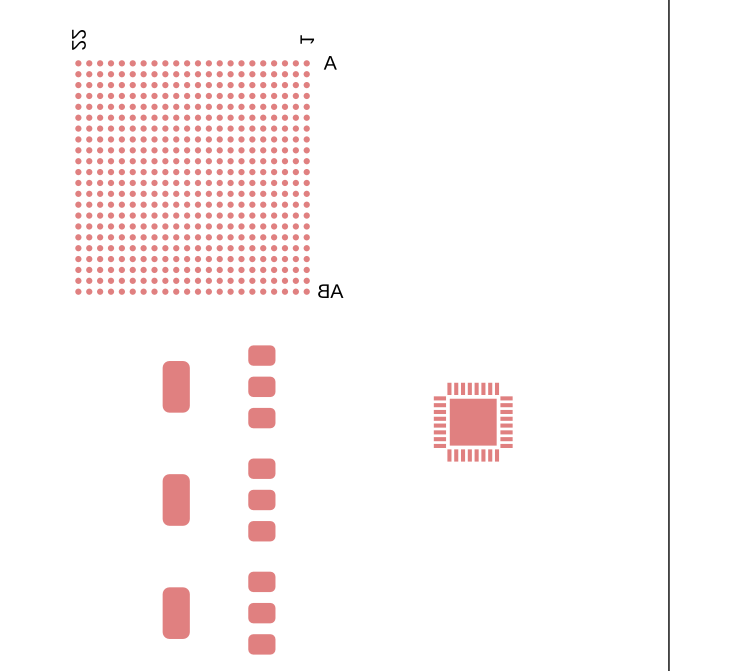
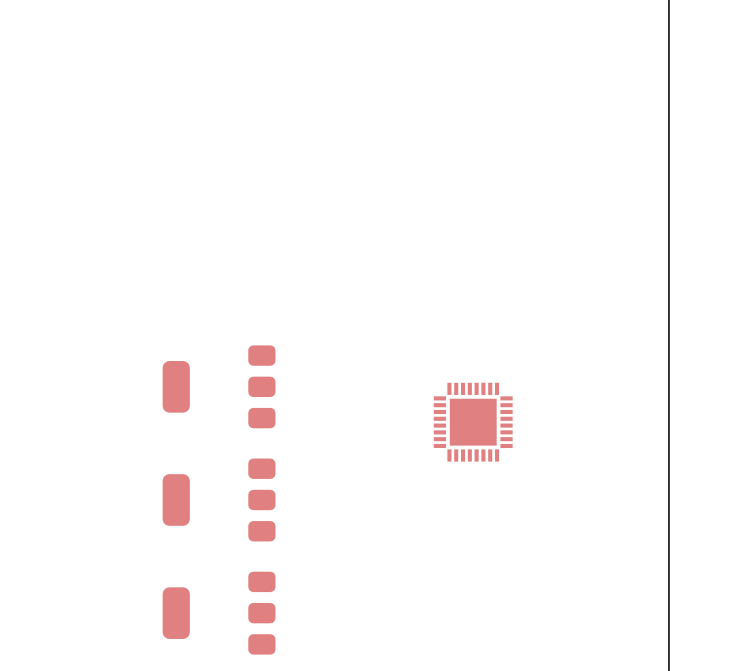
part: (192, 177) -> none

